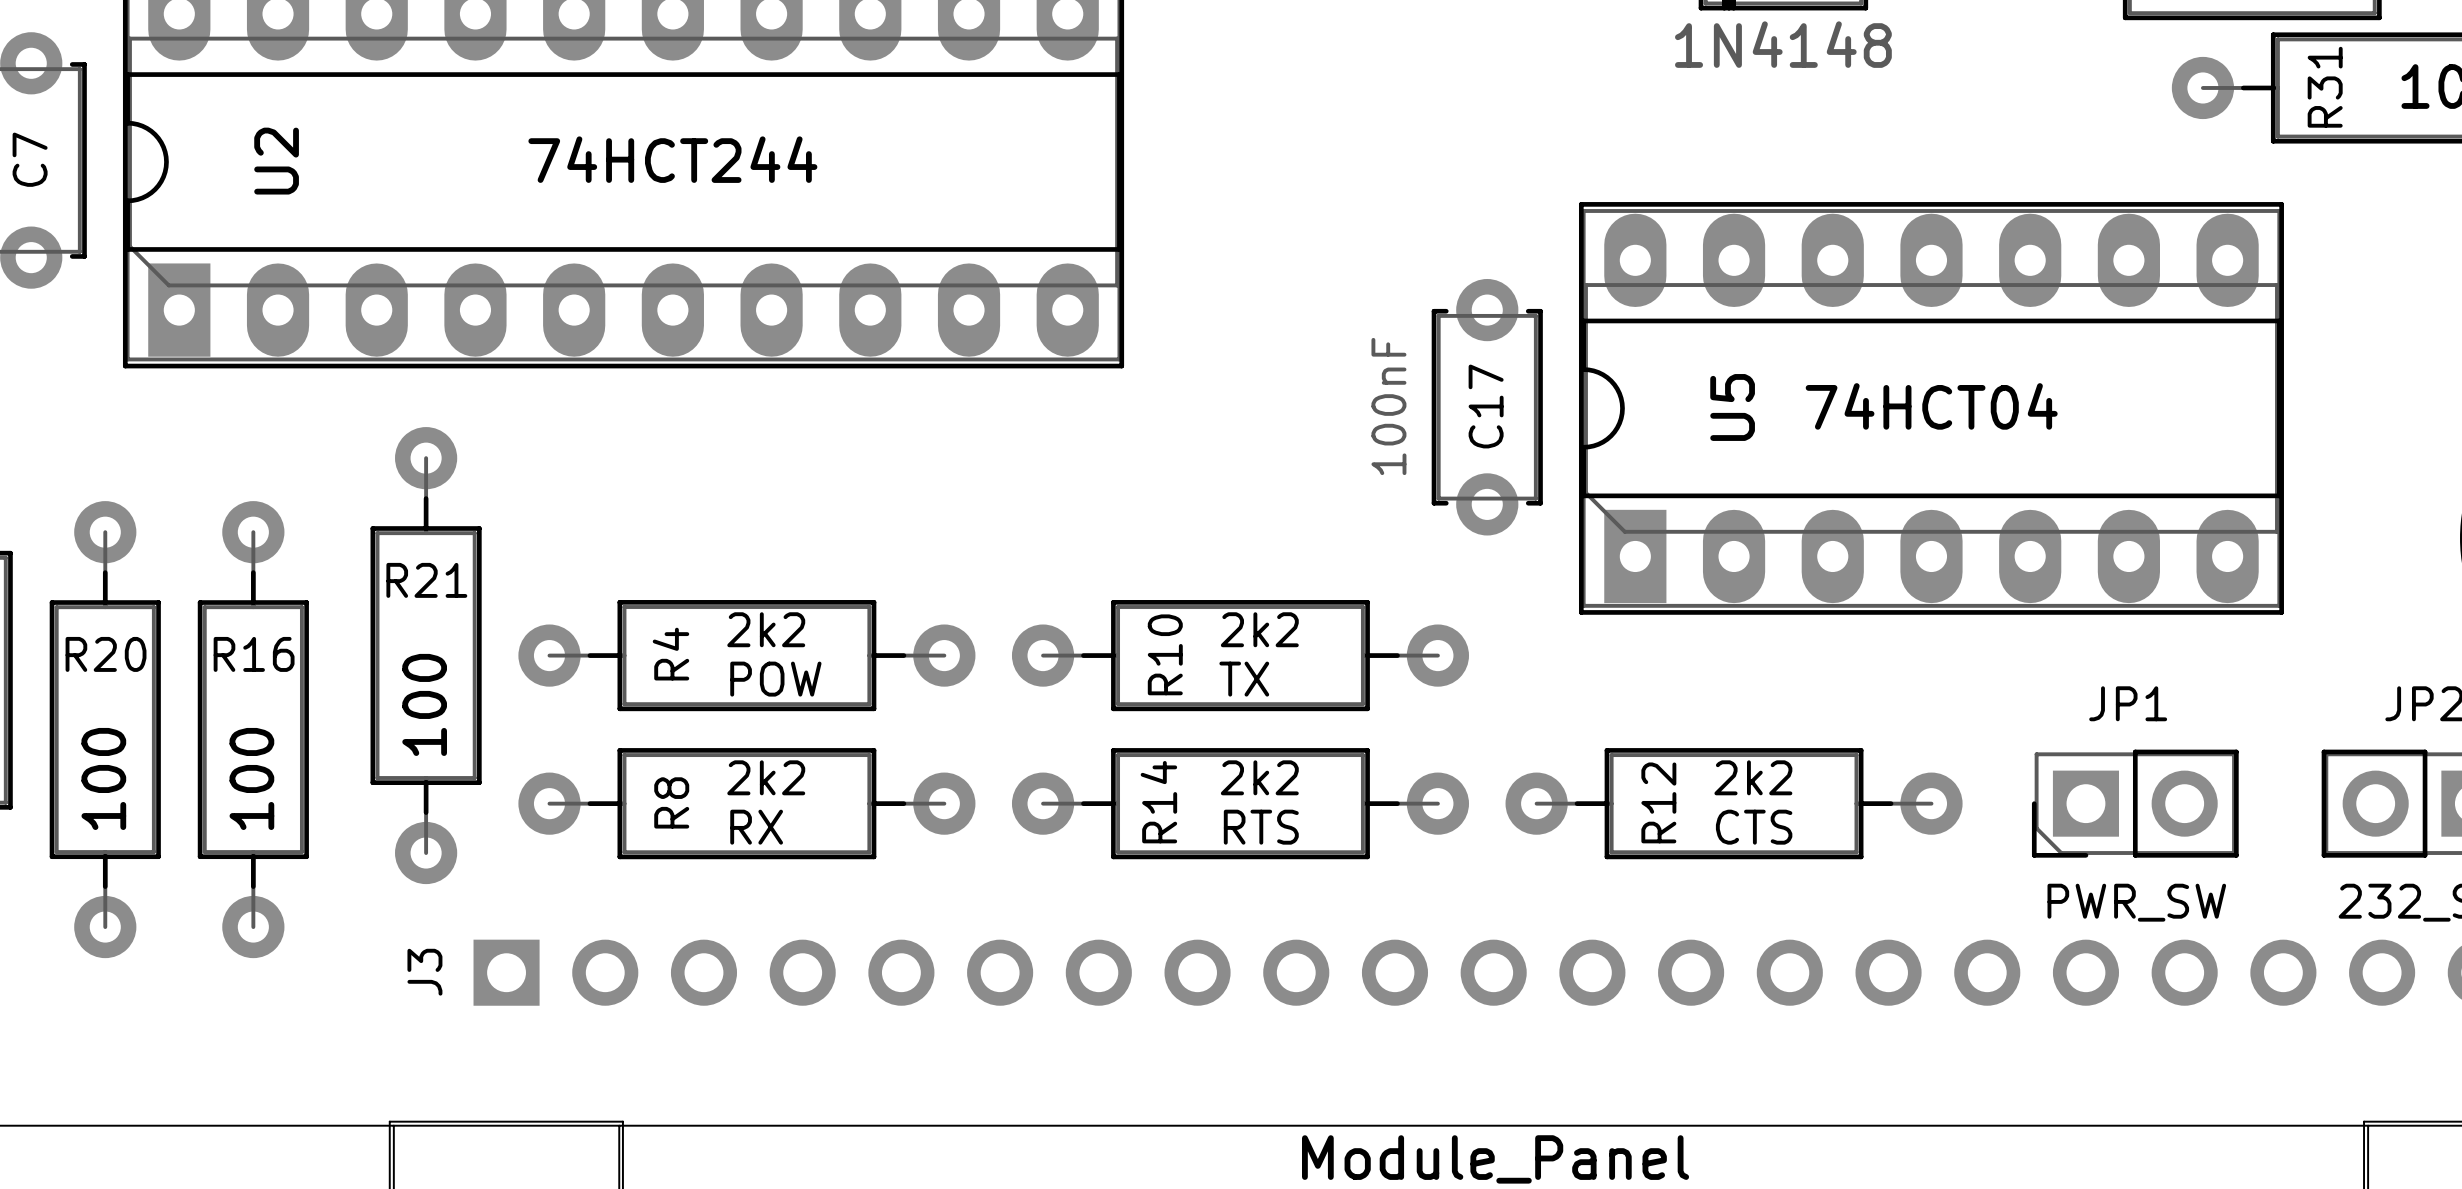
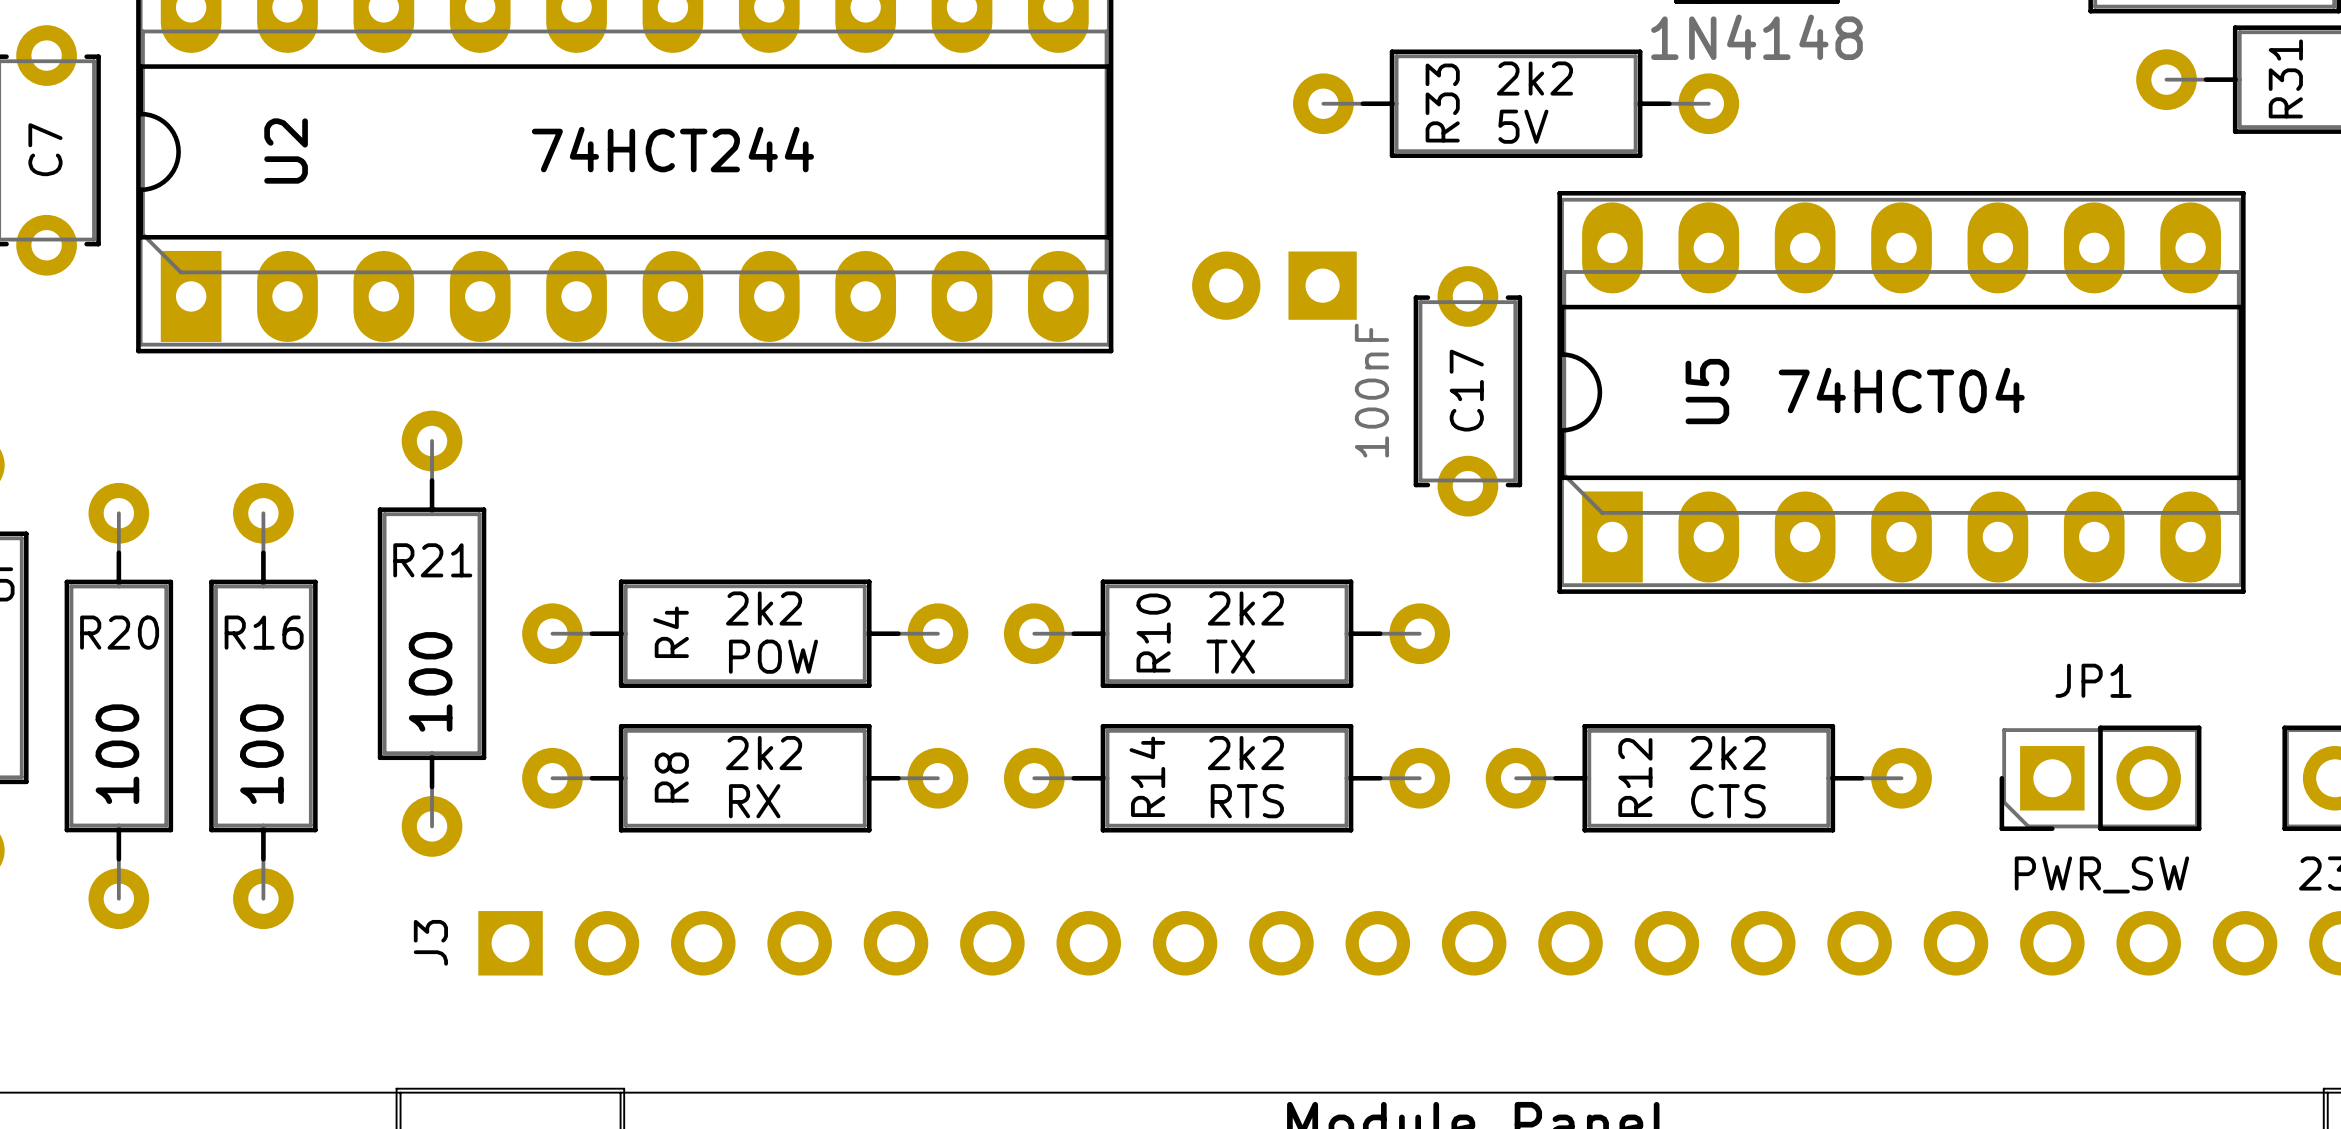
R33: none -> 2k2 (1516, 103)
text: none -> 5V (1523, 126)
part: none -> (1274, 285)

